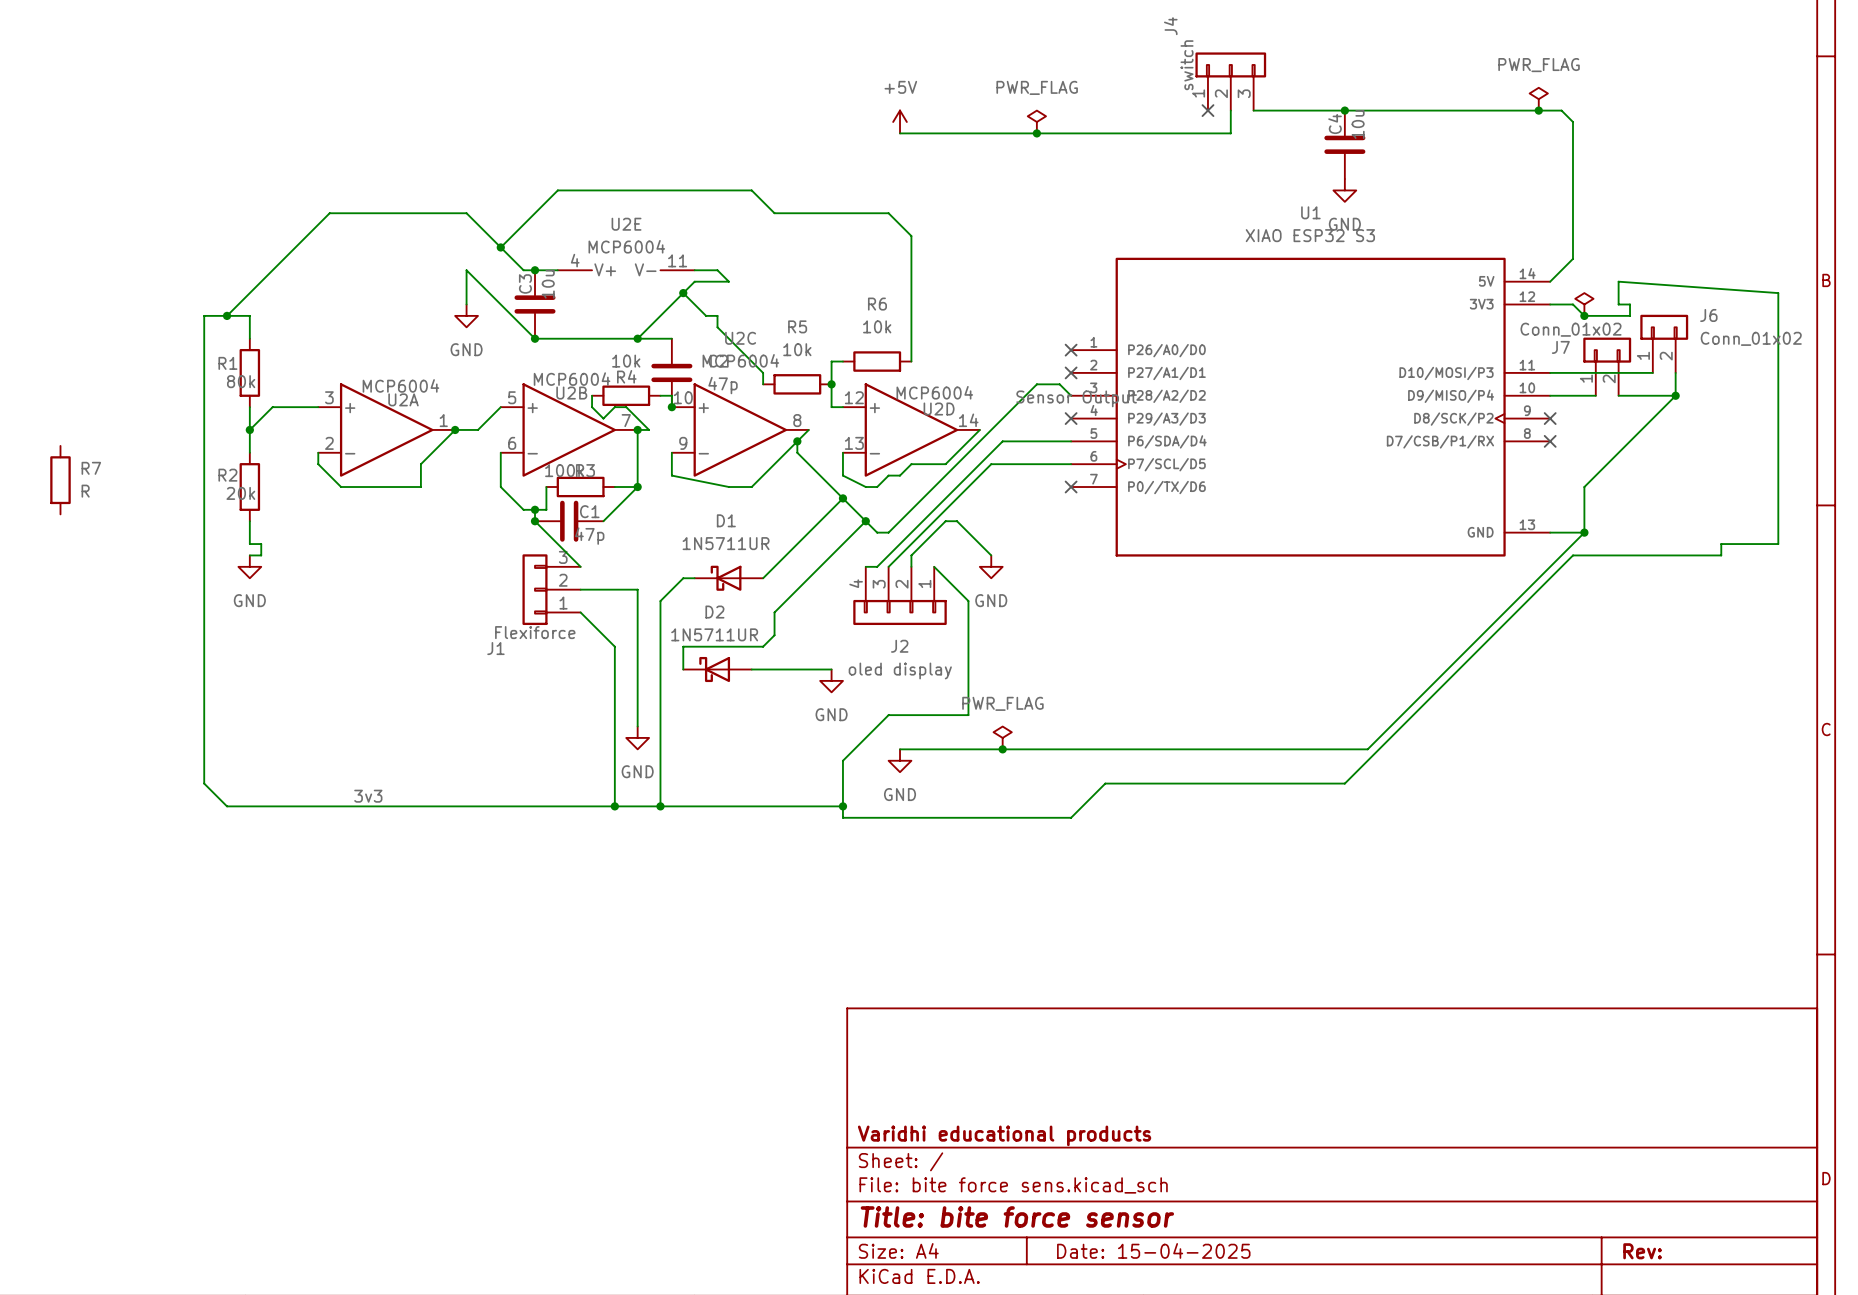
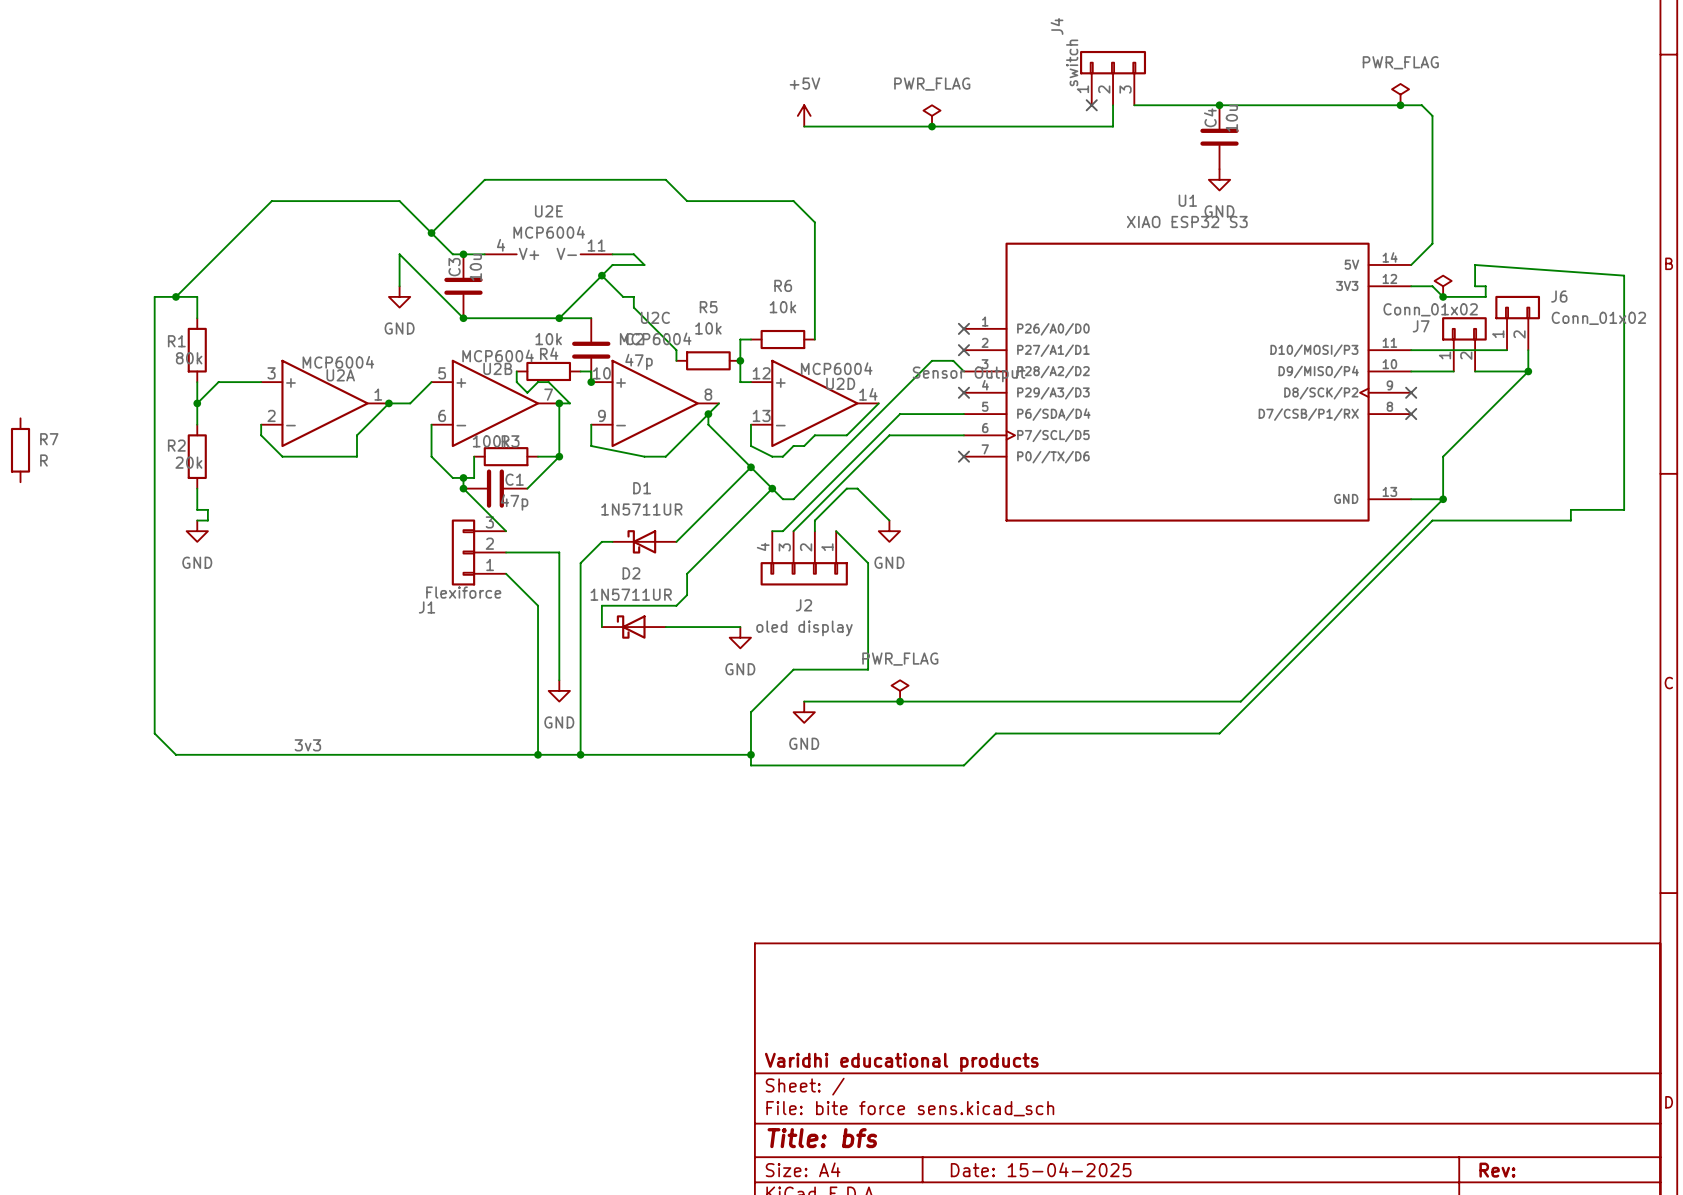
title block: Title: bite force sensor (1017, 1216) -> Title: bfs (822, 1138)

